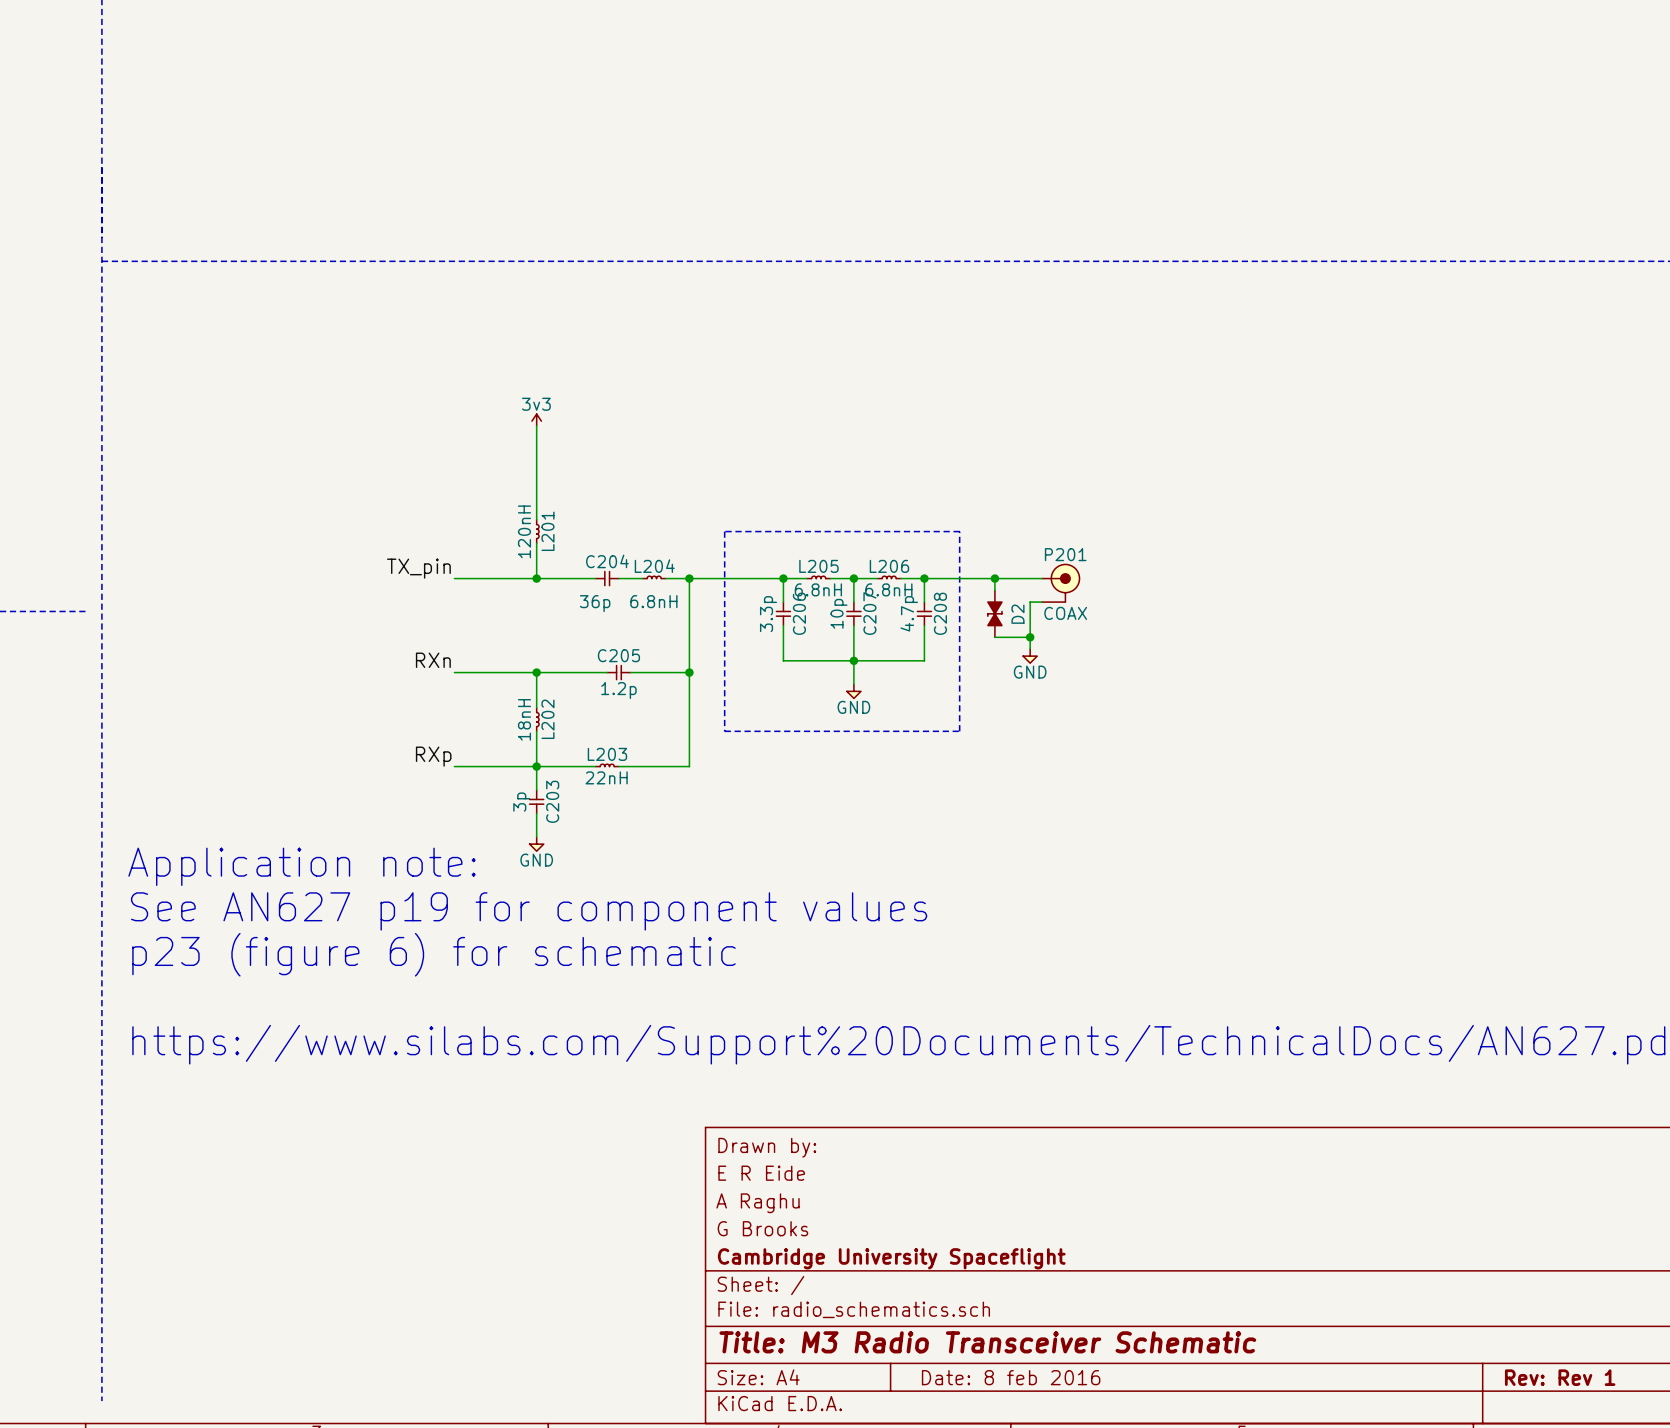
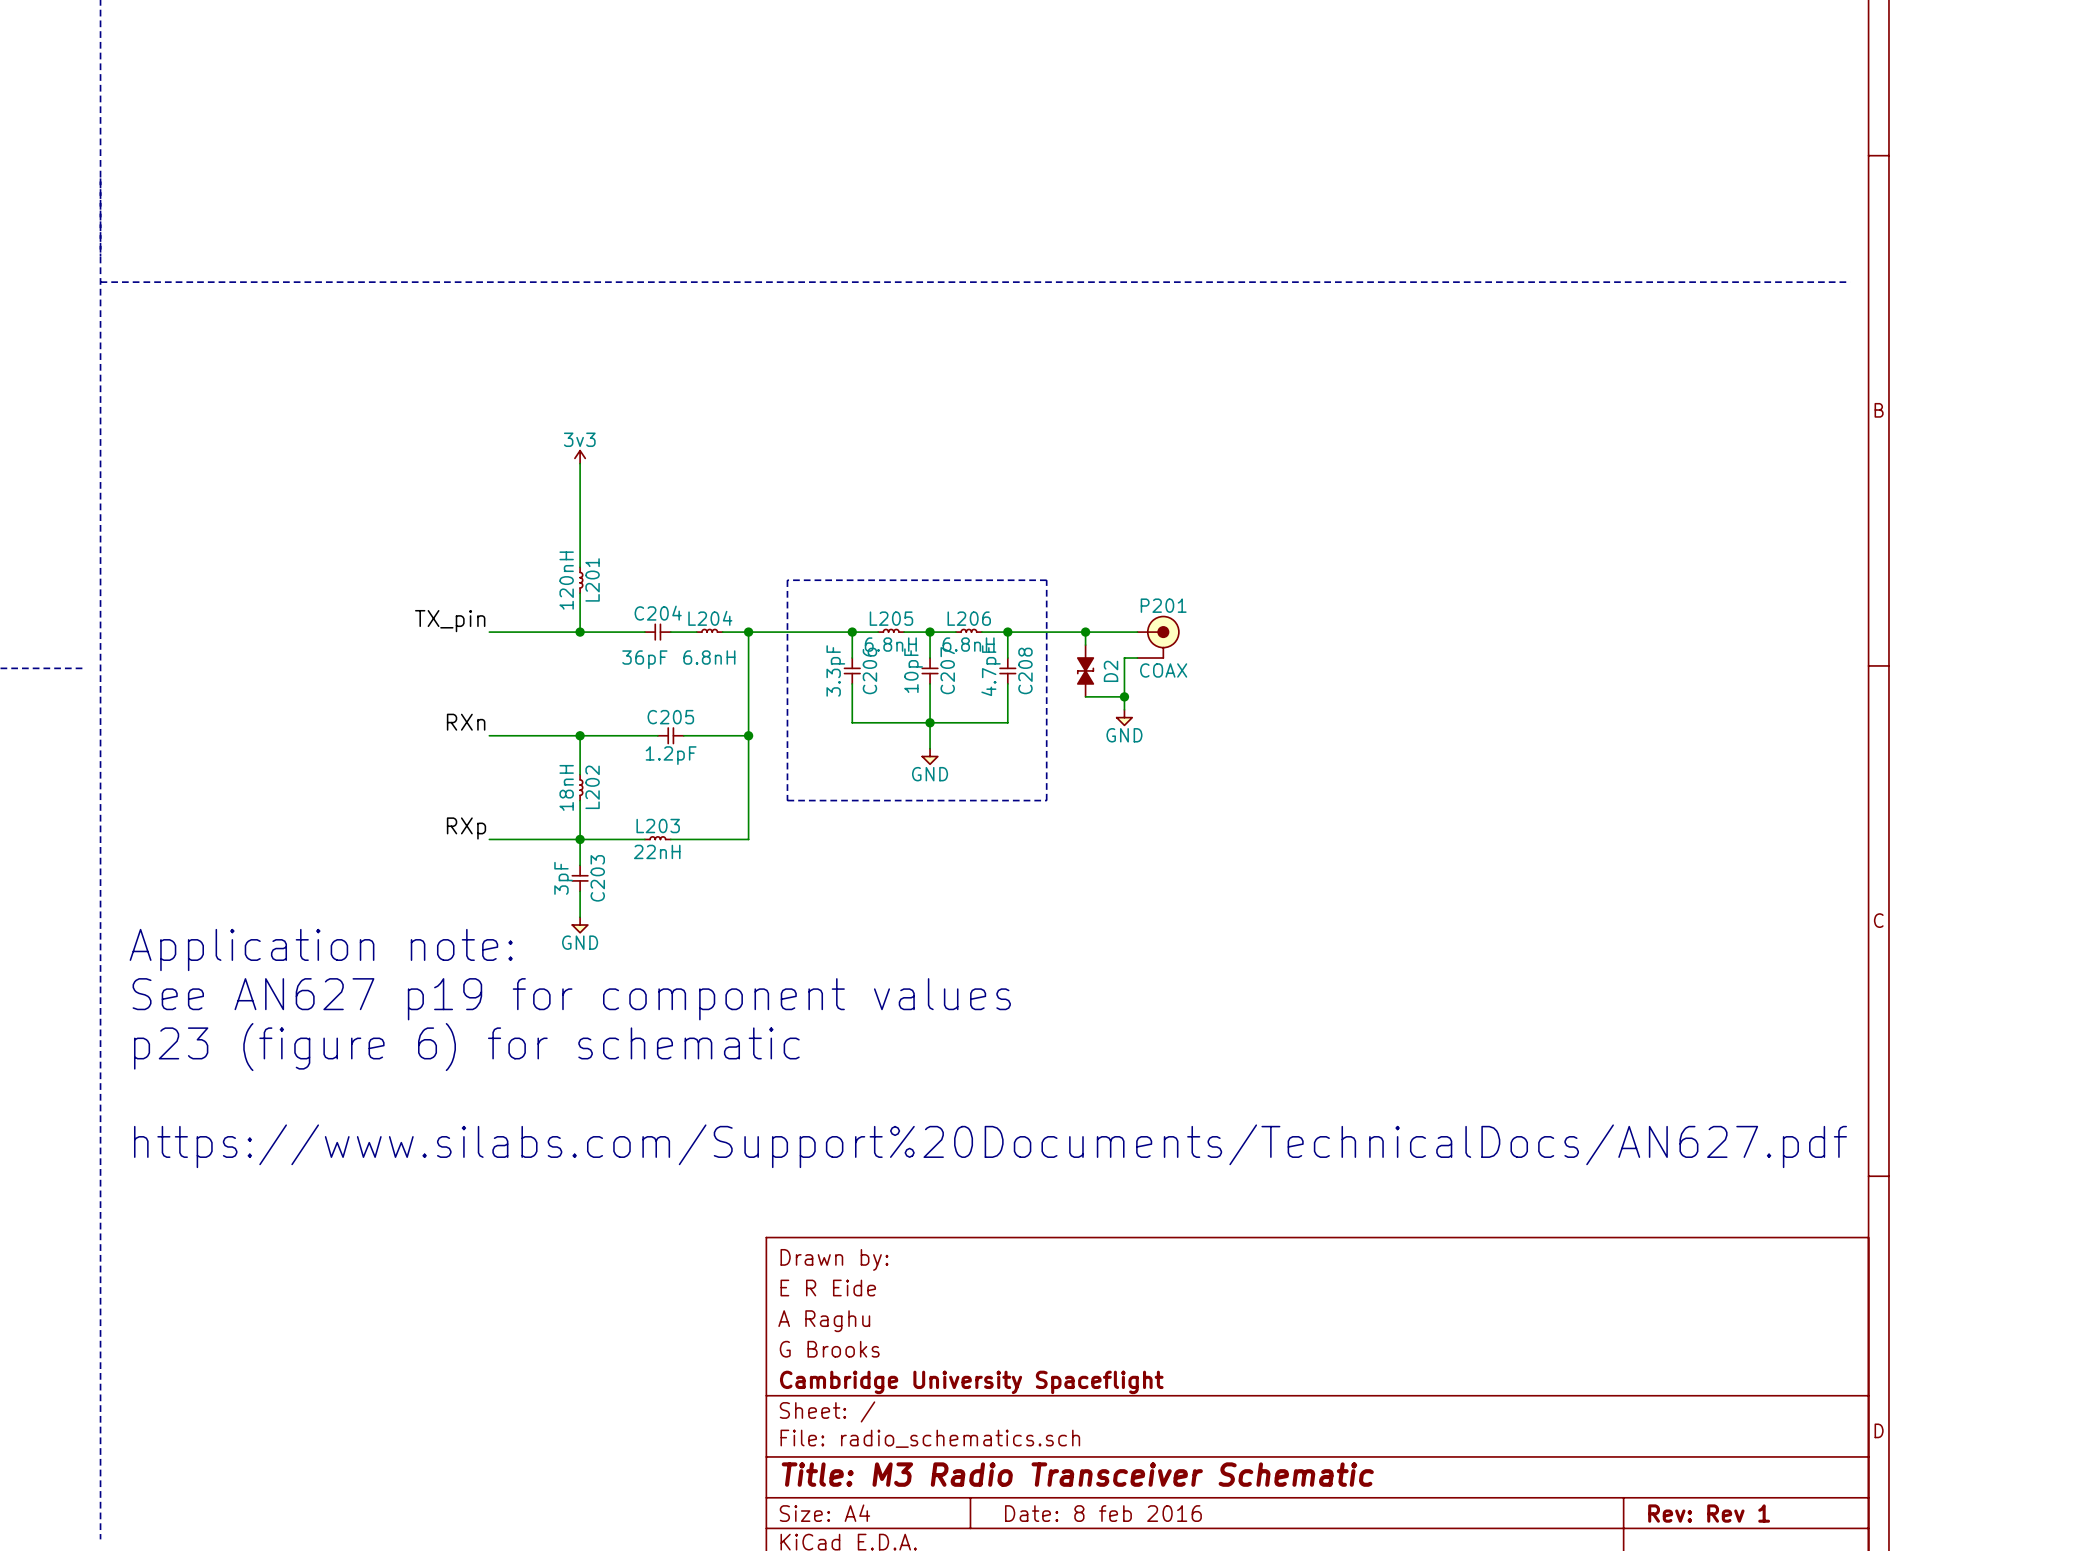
C204 value: 36p (595, 603) -> 36pF (644, 659)
C207 value: 10p (838, 613) -> 10pF (913, 670)
C208 value: 4.7p (909, 613) -> 4.7pF (991, 670)
C206 value: 3.3p (768, 614) -> 3.3pF (835, 670)
C205 value: 1.2p (618, 690) -> 1.2pF (671, 755)
C203 value: 3p (521, 802) -> 3pF (563, 878)

